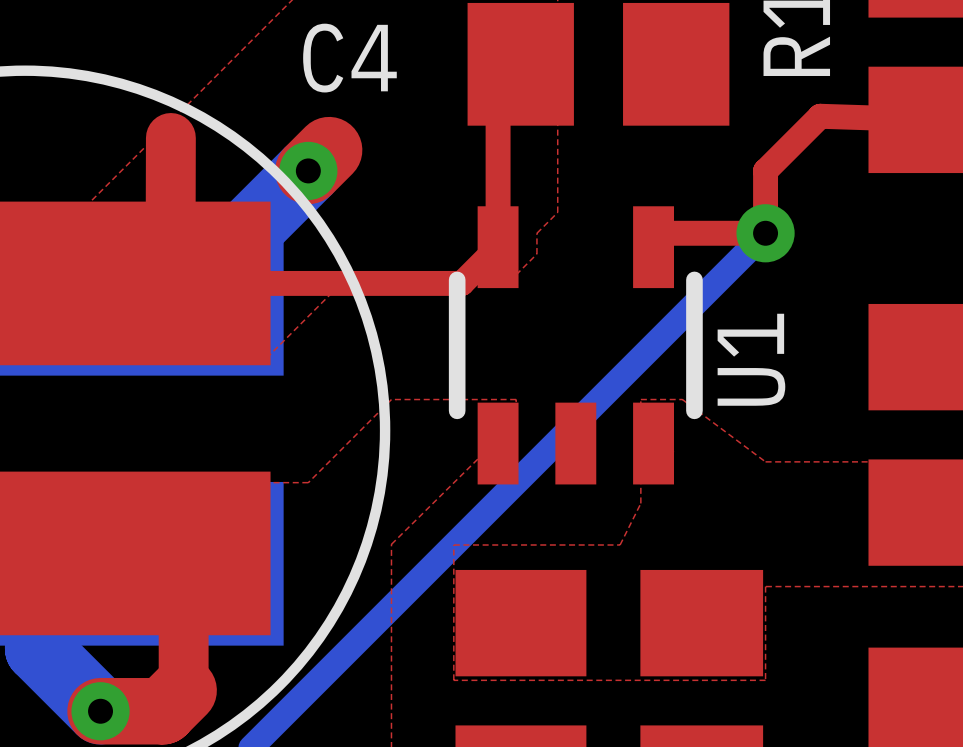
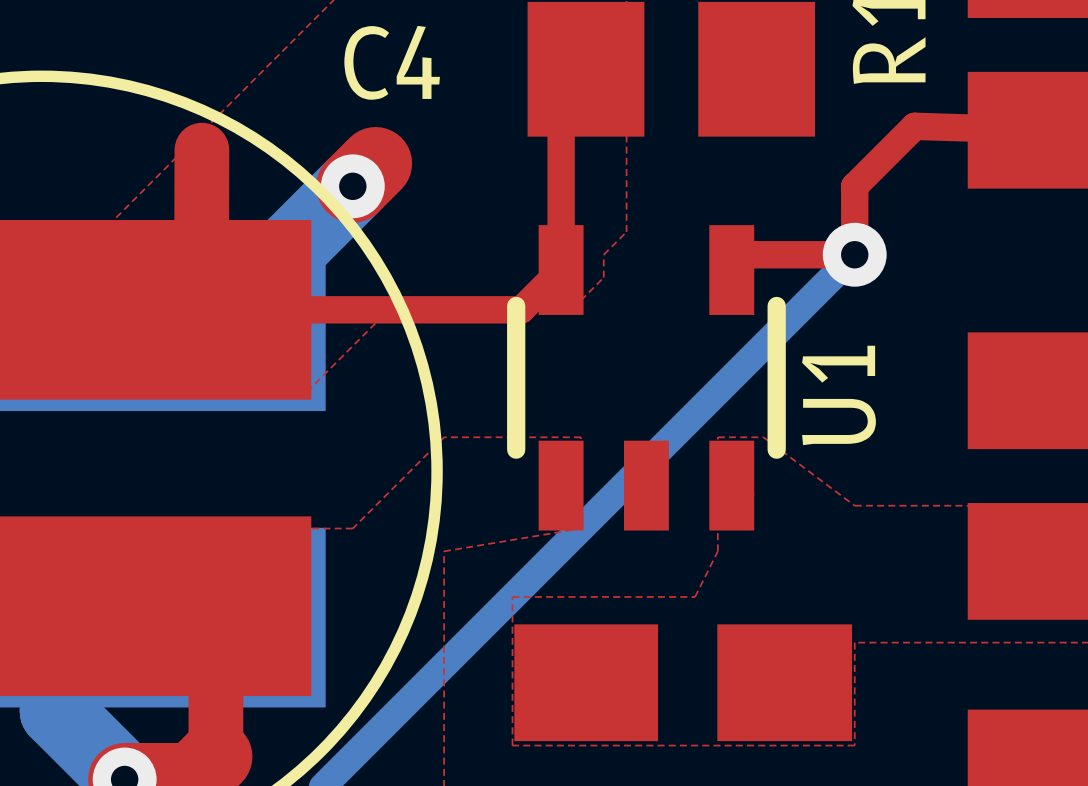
top zone outline: (516, 421) (391, 544) -> (580, 461) (580, 528) (444, 551) (444, 596)

